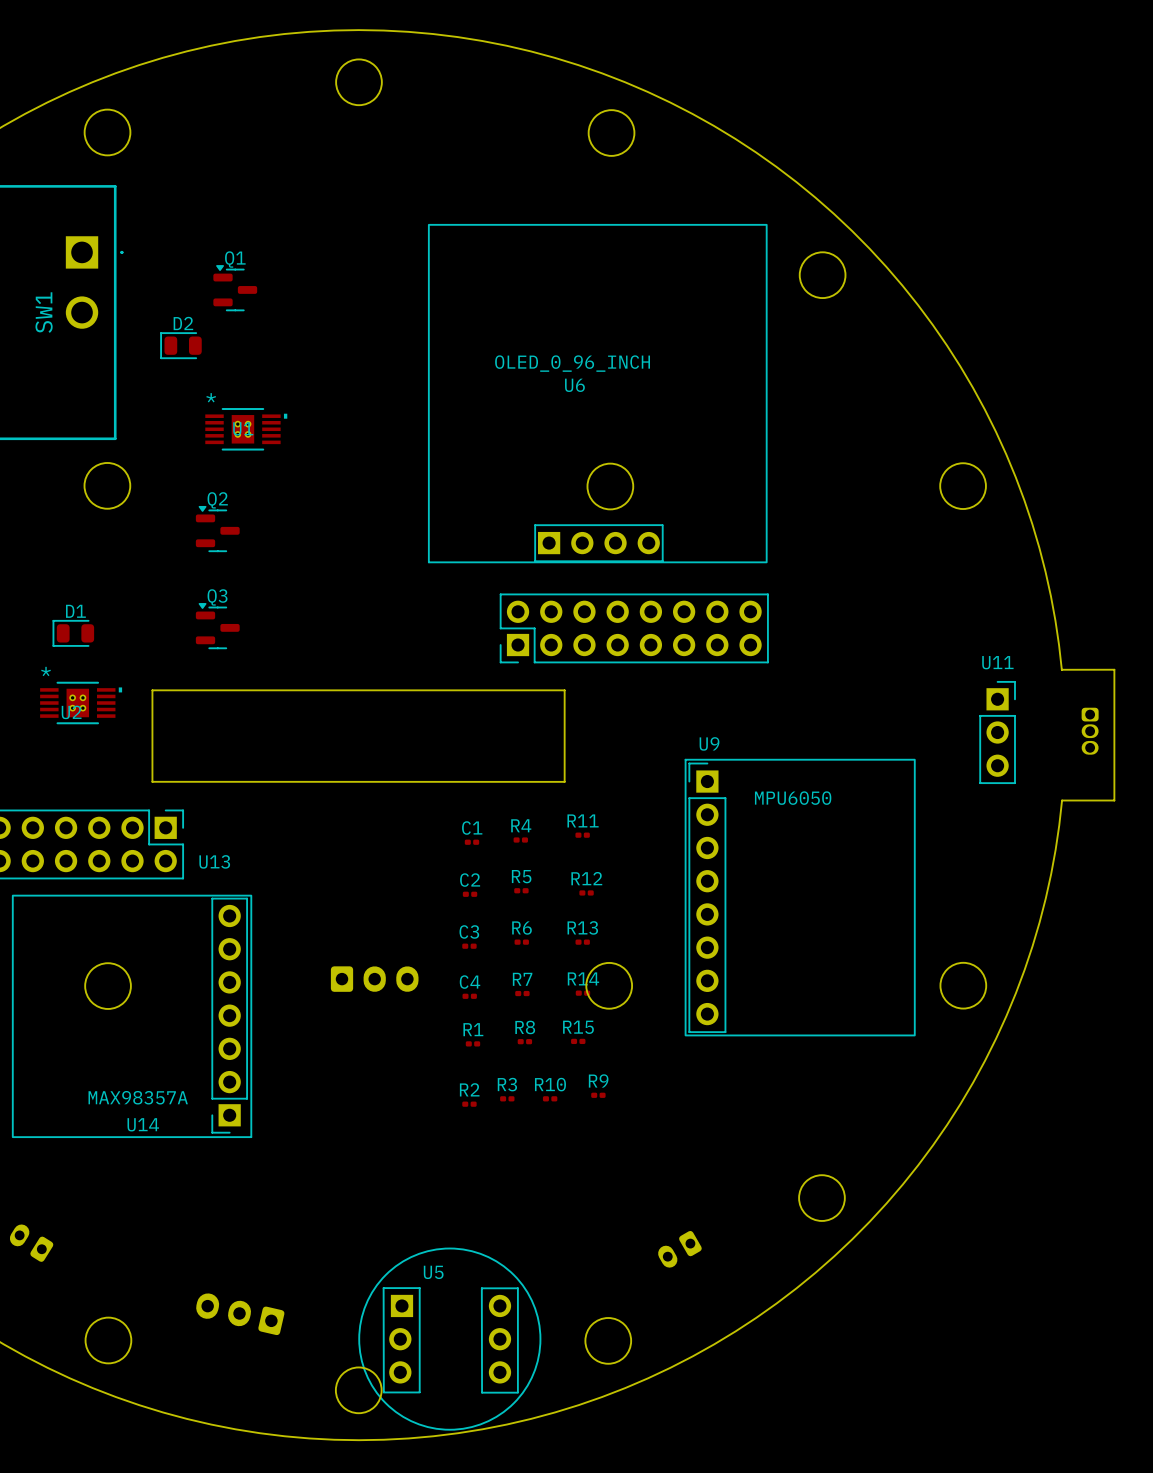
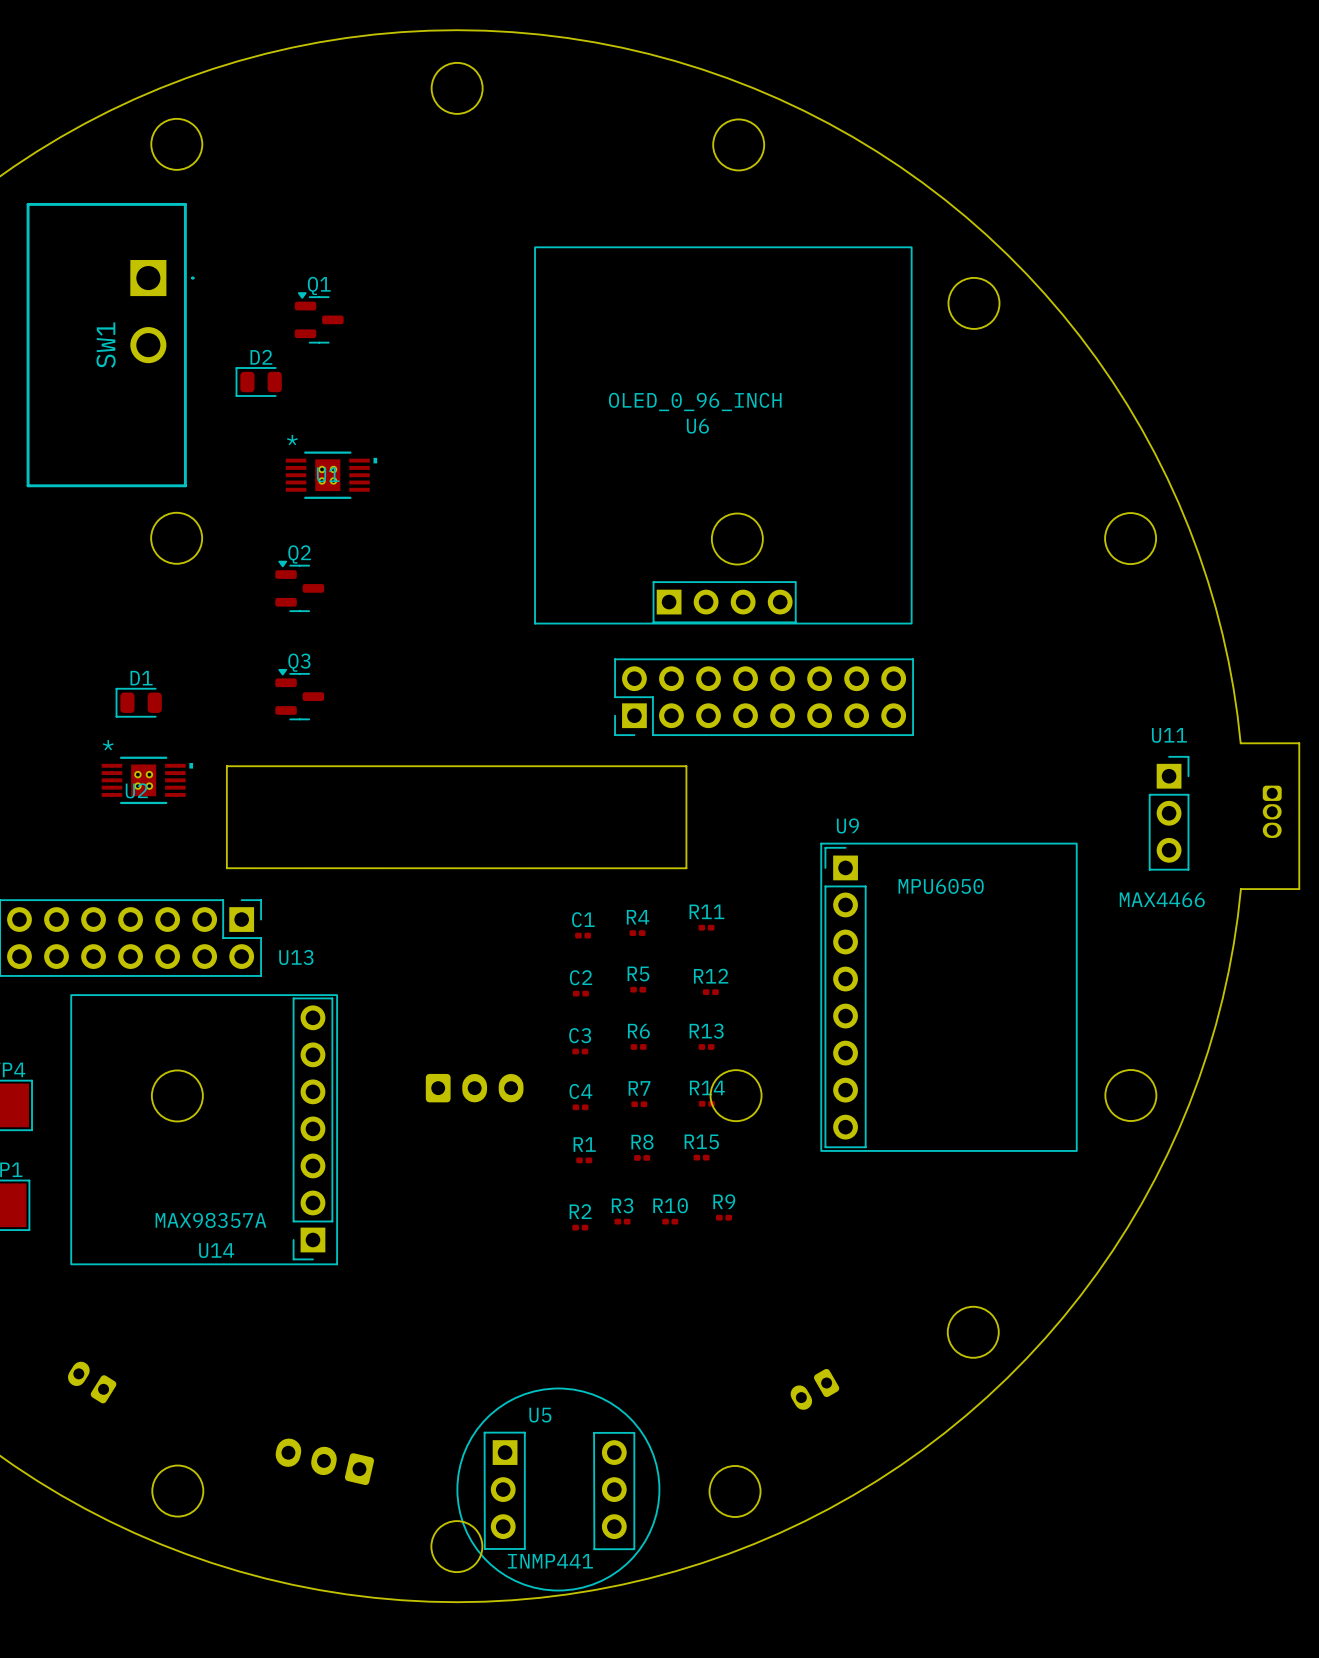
U11 text: none -> MAX4466 (1162, 899)
U5 text: none -> INMP441 (550, 1561)

